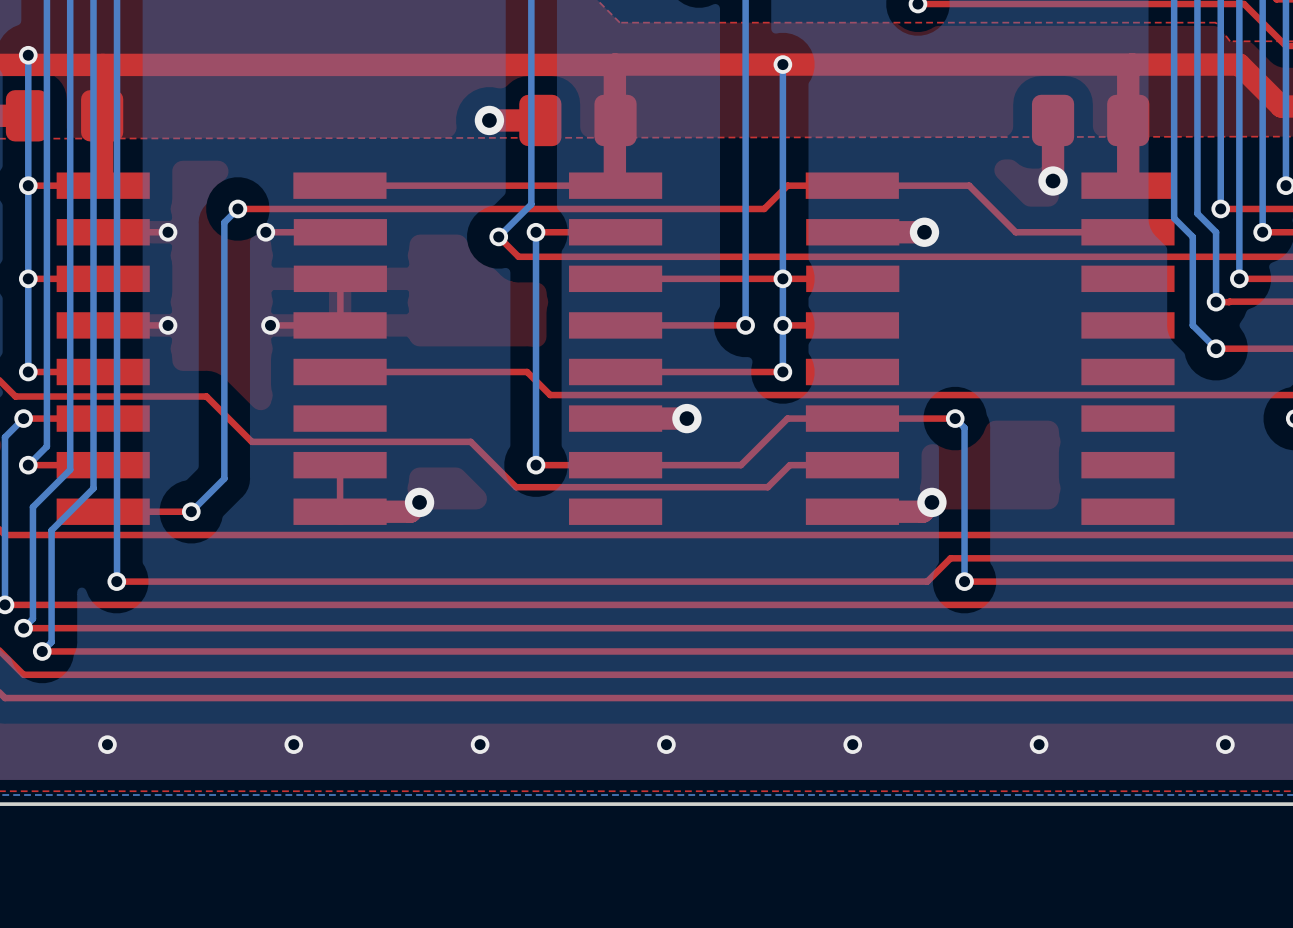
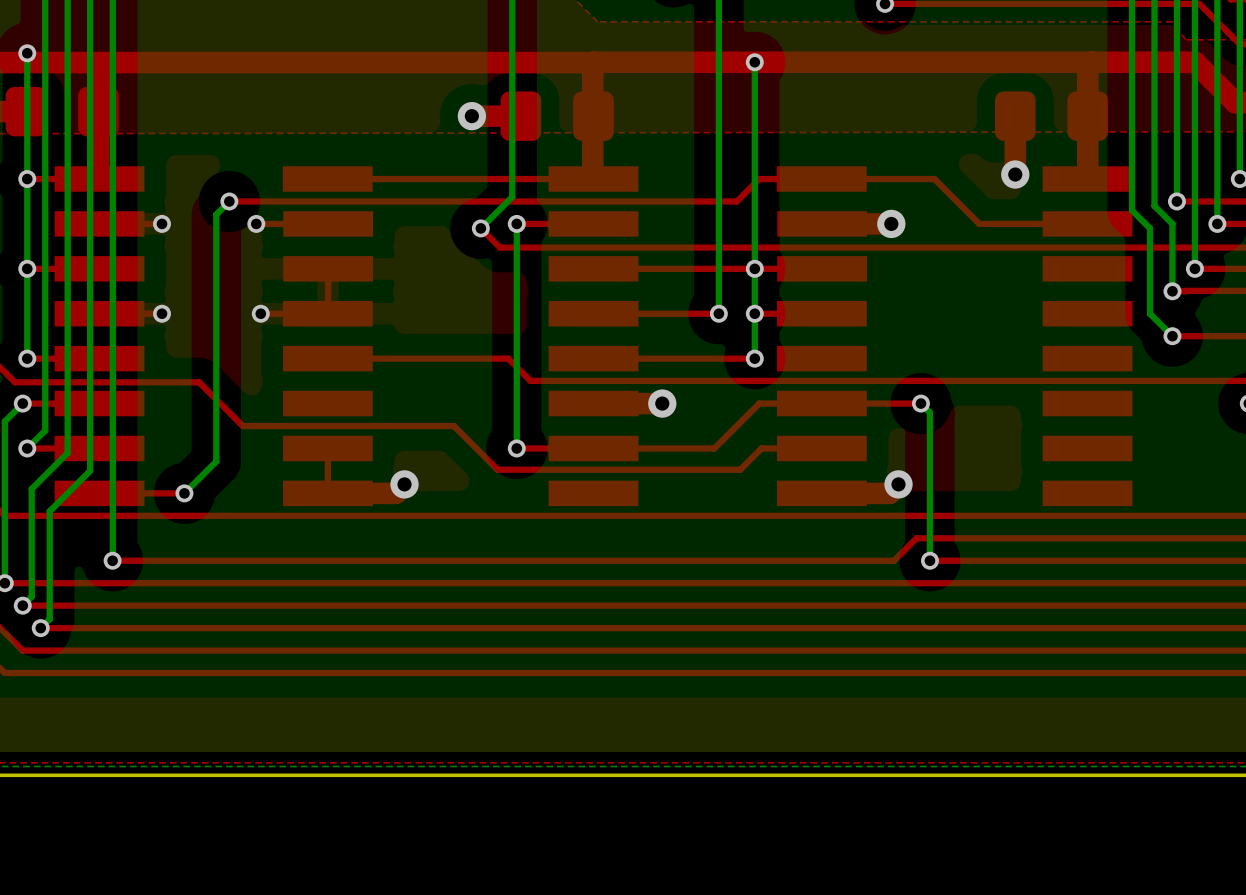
via: (107, 744) -> none
via: (293, 744) -> none
via: (480, 744) -> none
via: (666, 744) -> none
via: (852, 744) -> none
via: (1039, 744) -> none
via: (1225, 744) -> none

